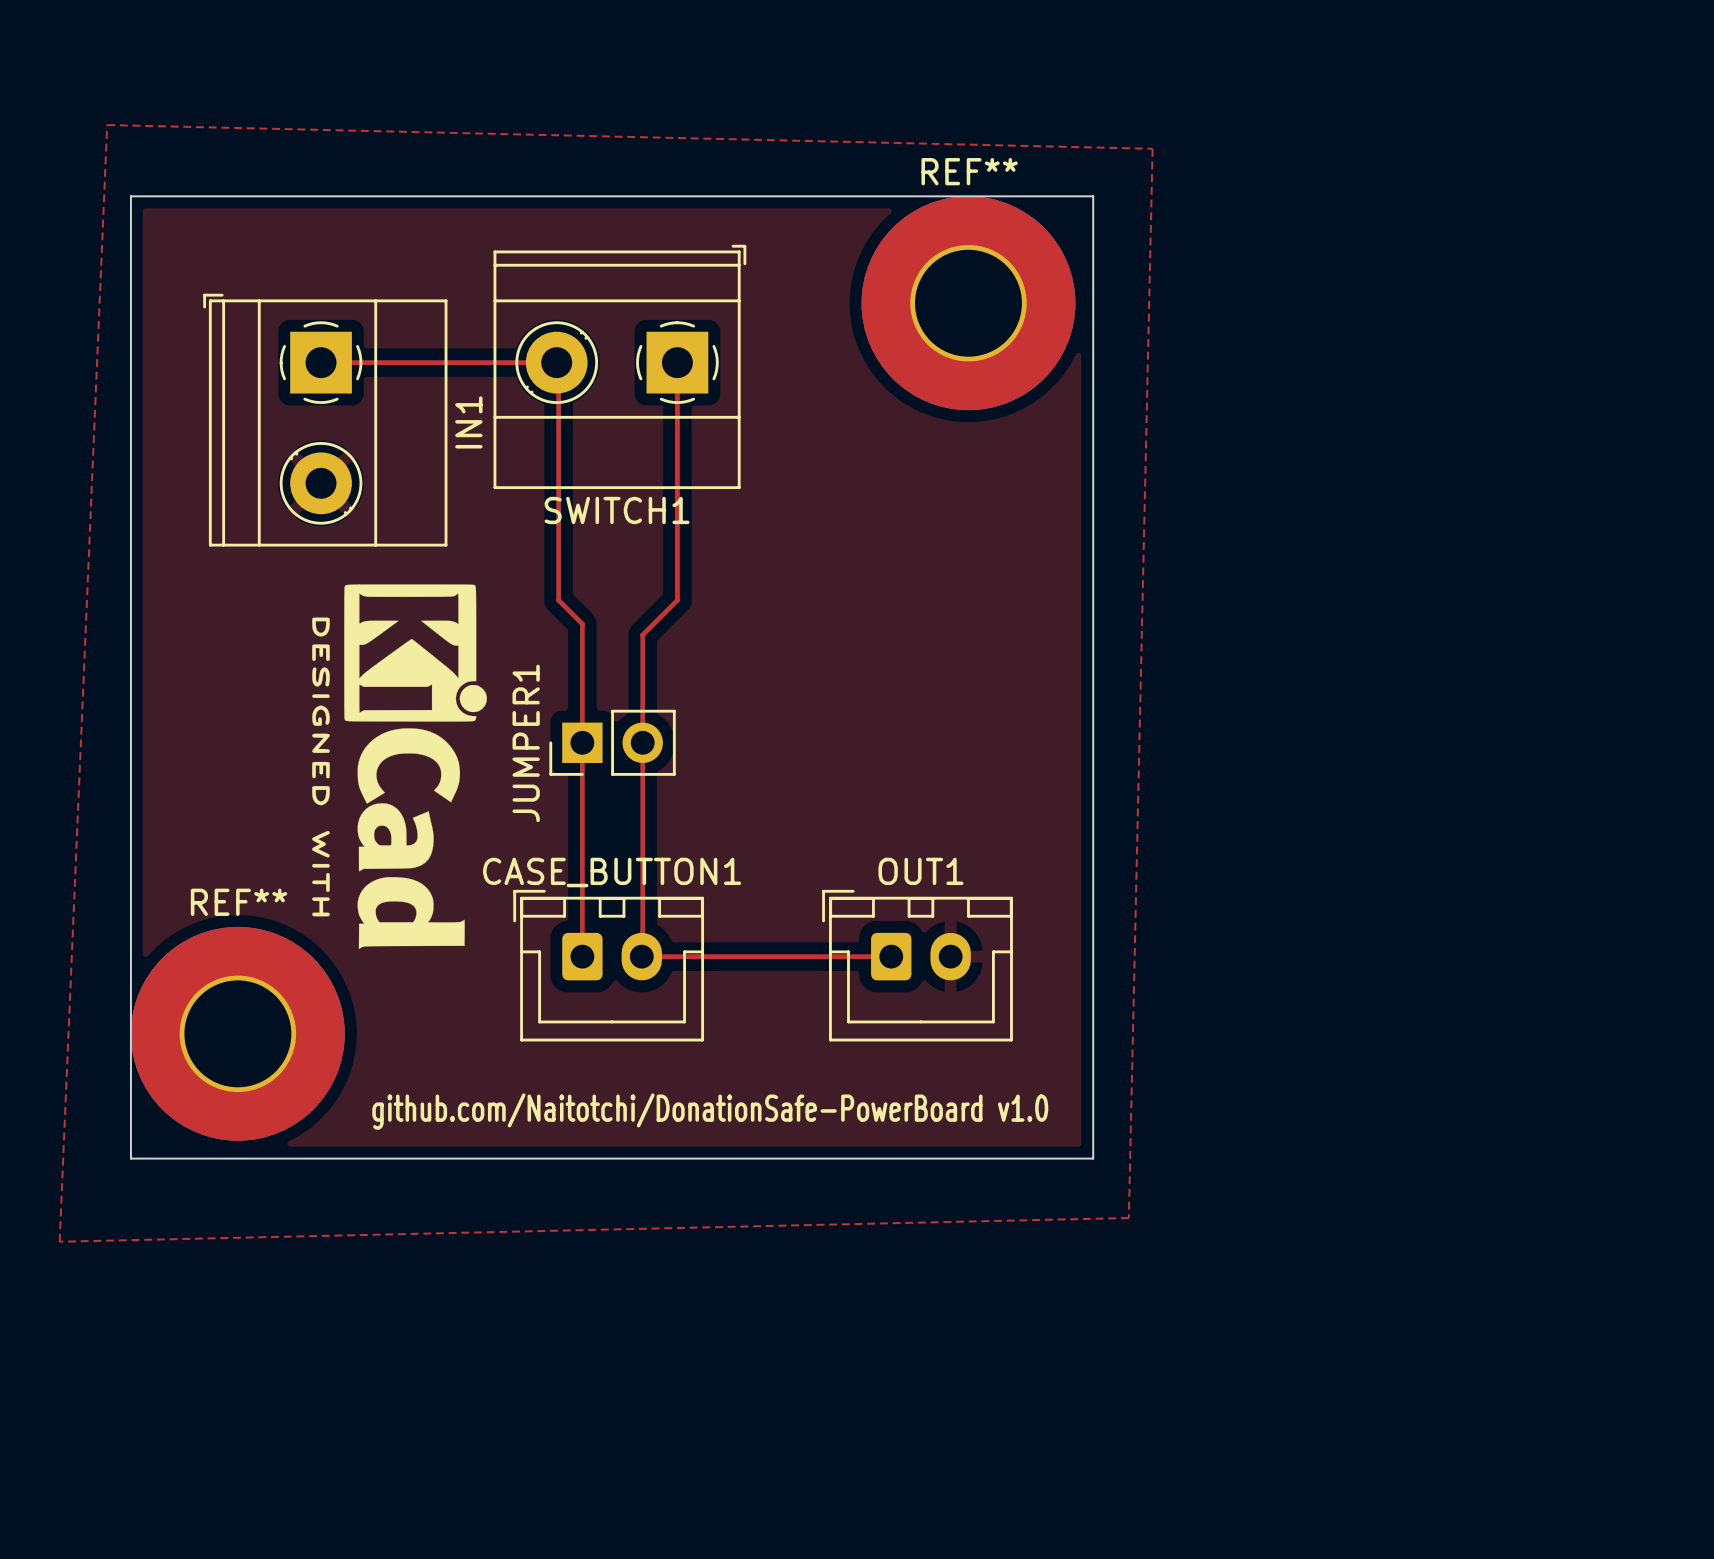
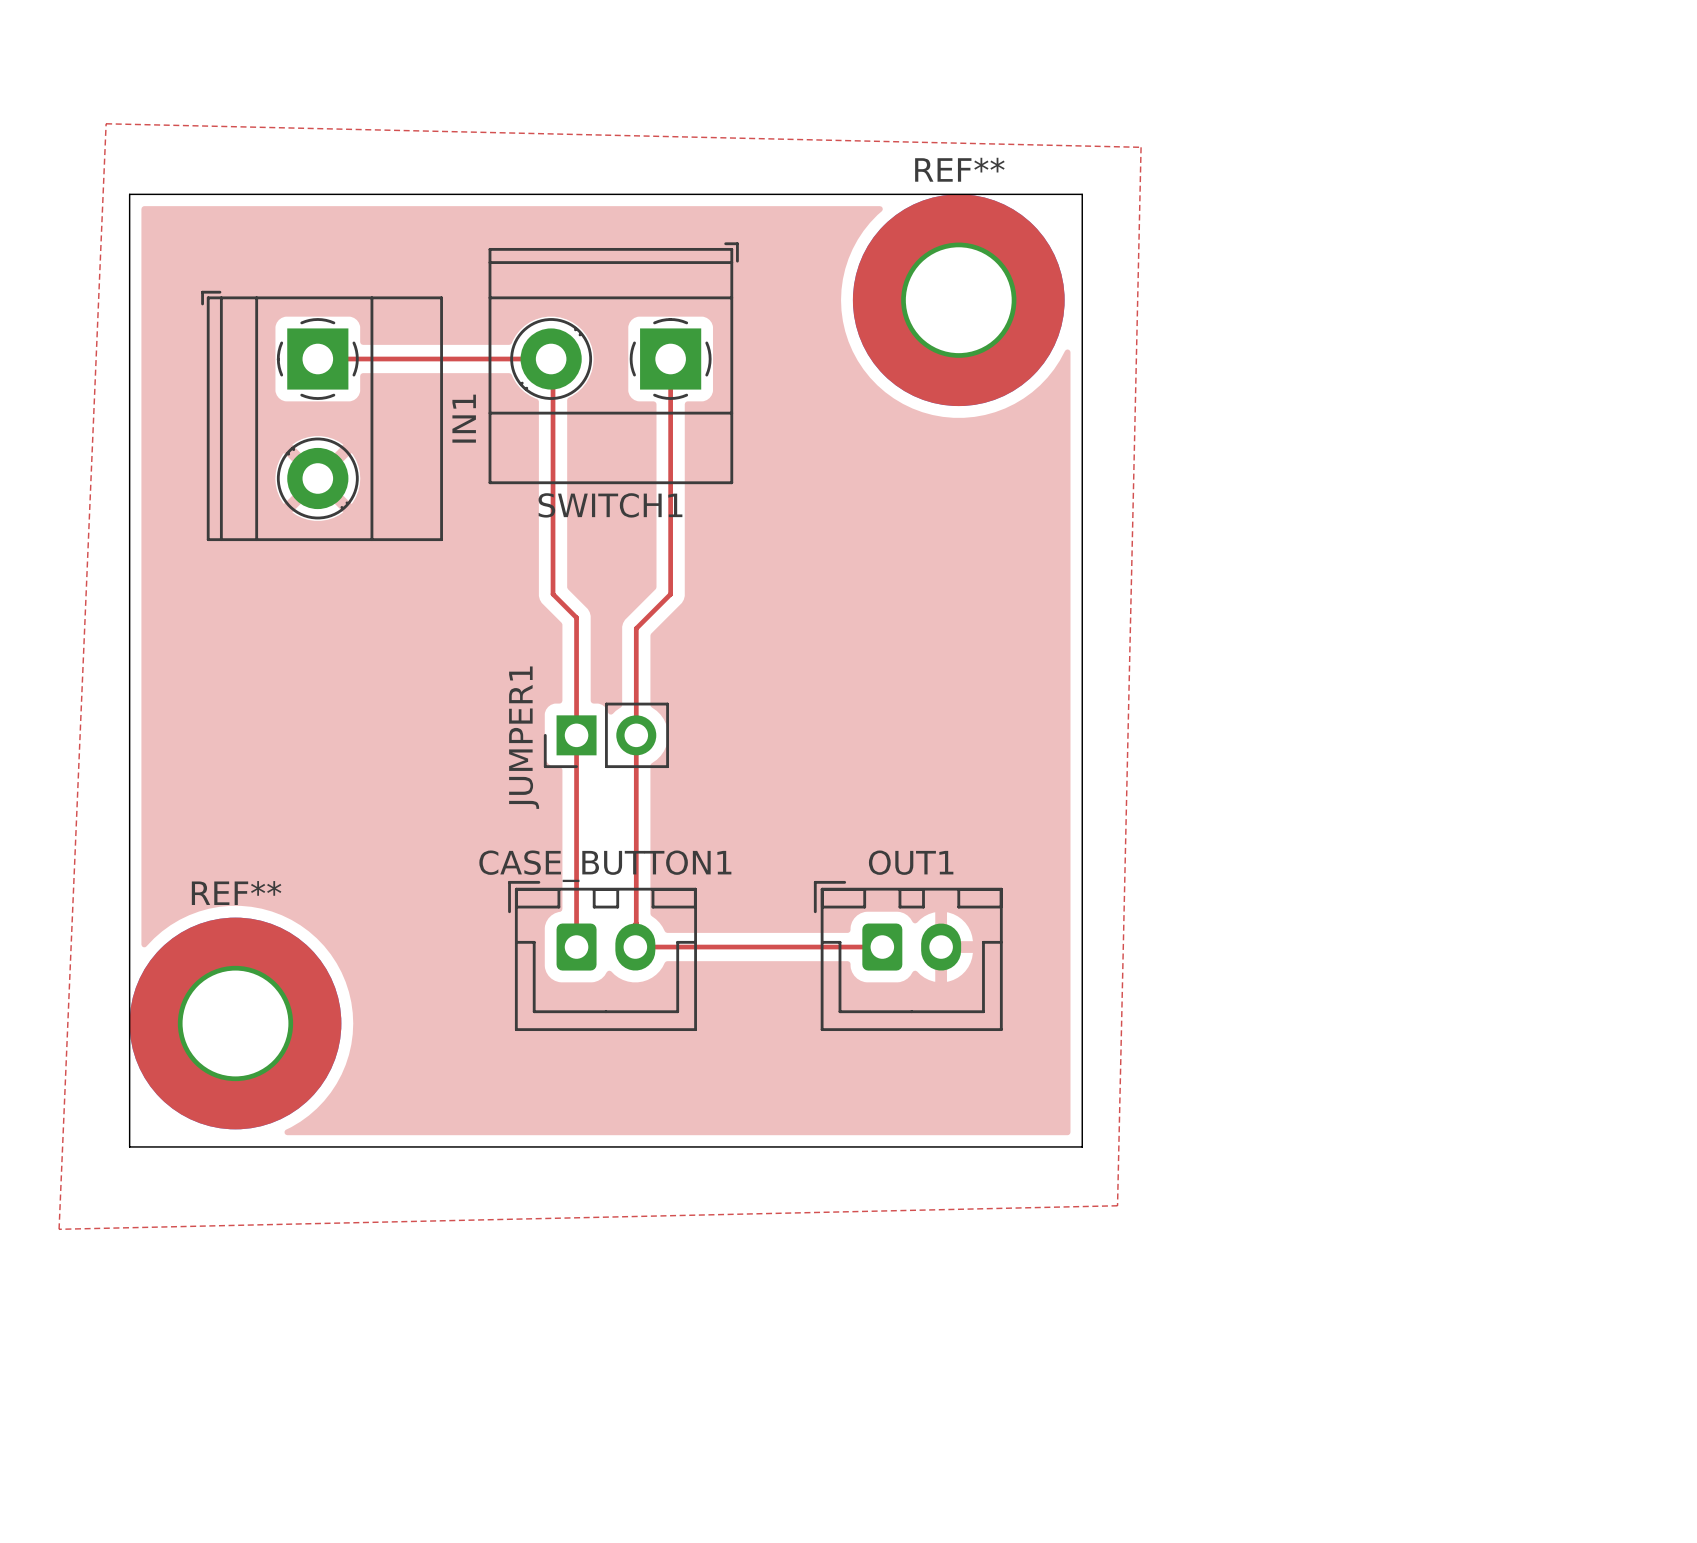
drawing: [312, 584, 487, 950] -> none
text: github.com/Naitotchi/DonationSafe-PowerBoard v1.0 (710, 1111) -> none

